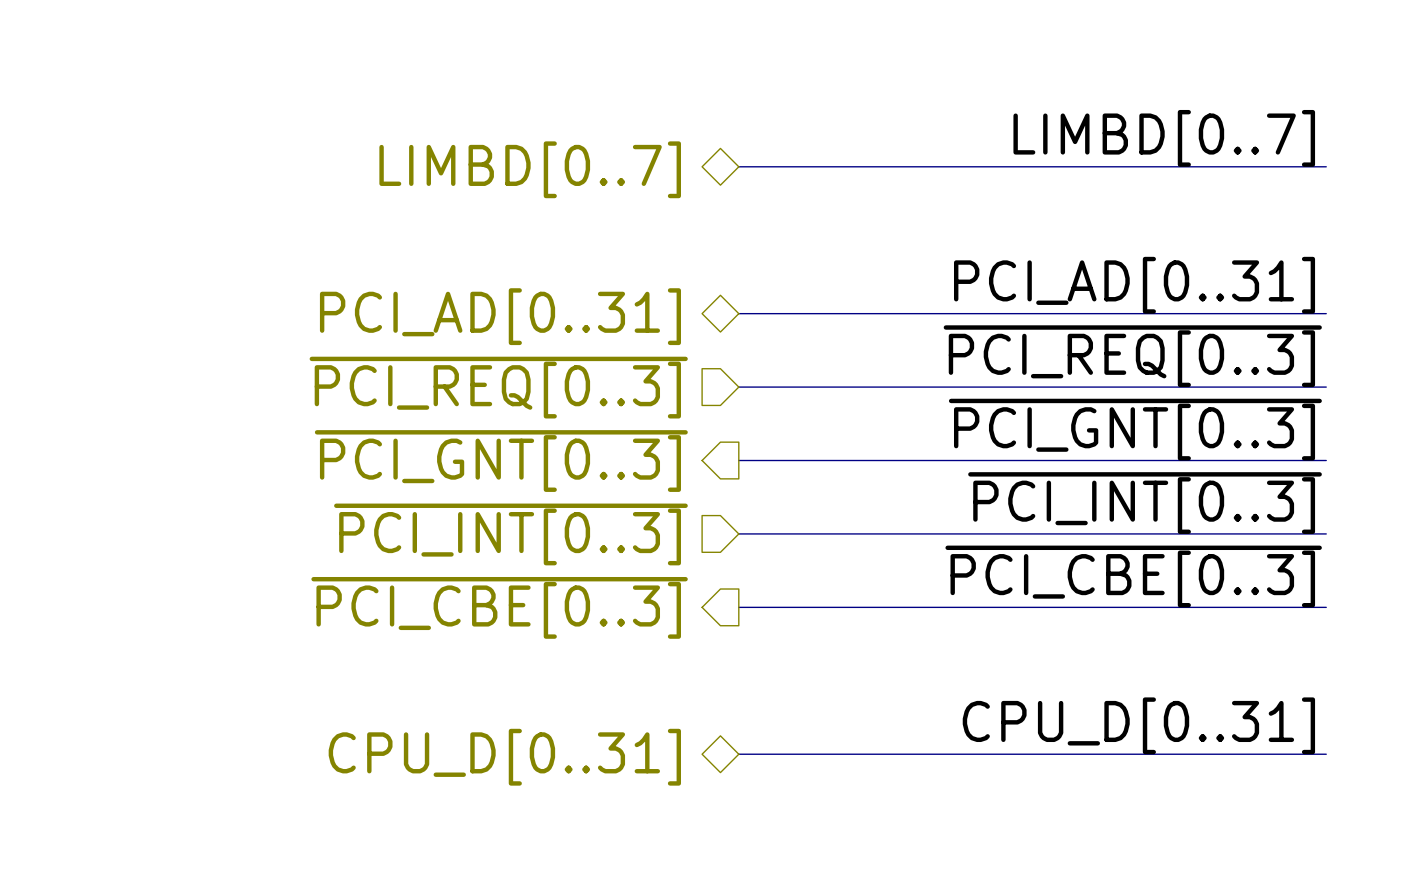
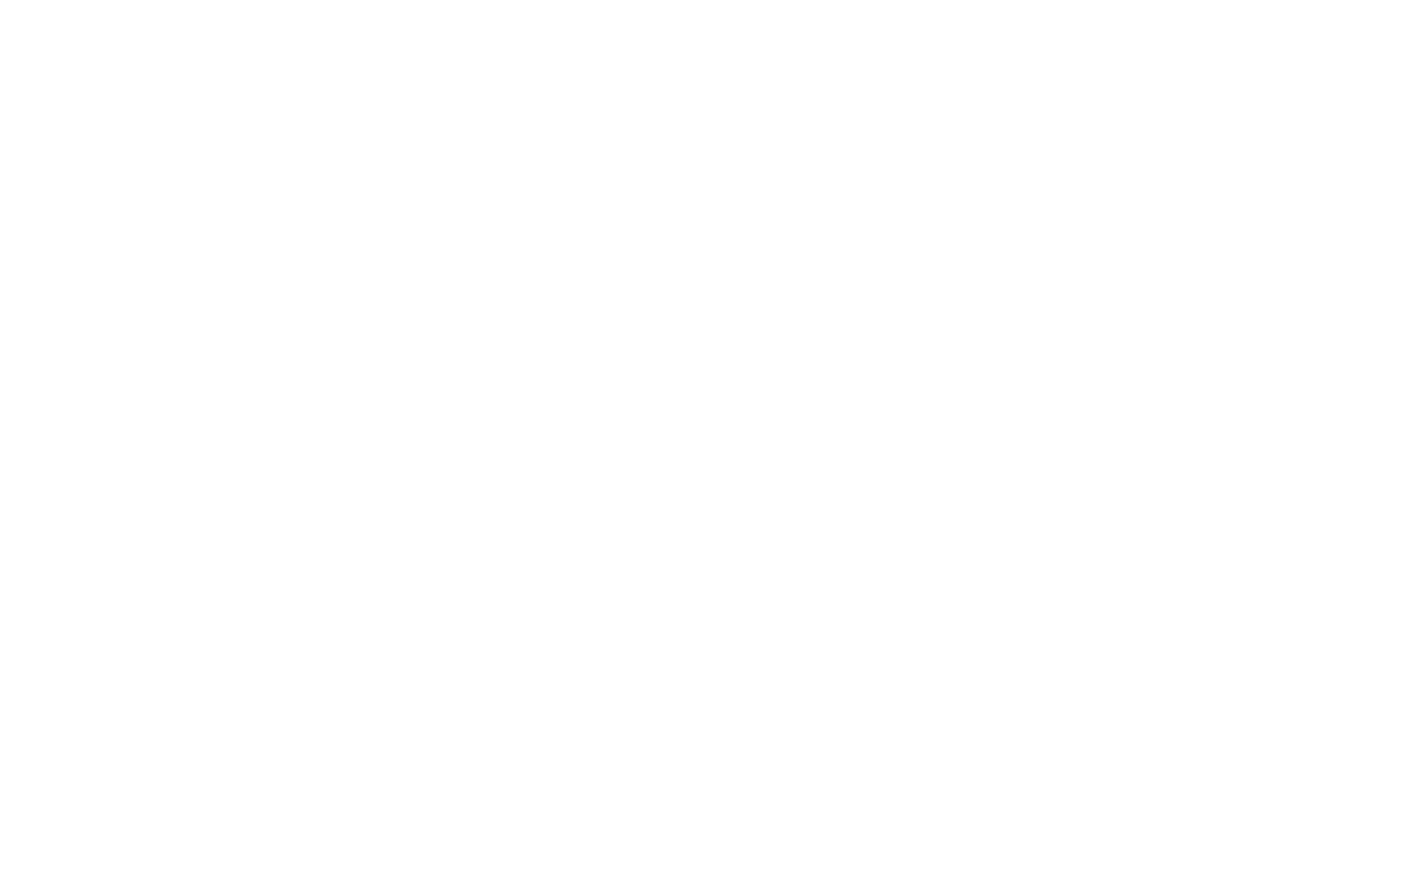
label: LIMBD[0..7] (1164, 138) -> none
bus: (738, 166) (1326, 166) -> none
hierarchical label: LIMBD[0..7] (530, 169) -> none
label: PCI_AD[0..31] (1134, 285) -> none
bus: (738, 313) (1326, 313) -> none
hierarchical label: PCI_AD[0..31] (500, 316) -> none
label: ~{PCI_REQ[0..3]} (1132, 356) -> none
hierarchical label: ~{PCI_REQ[0..3]} (498, 387) -> none
bus: (738, 387) (1326, 387) -> none
label: ~{PCI_GNT[0..3]} (1135, 429) -> none
bus: (738, 460) (1326, 460) -> none
hierarchical label: ~{PCI_GNT[0..3]} (501, 461) -> none
label: ~{PCI_INT[0..3]} (1145, 503) -> none
bus: (738, 533) (1326, 533) -> none
hierarchical label: ~{PCI_INT[0..3]} (510, 534) -> none
label: ~{PCI_CBE[0..3]} (1133, 576) -> none
hierarchical label: ~{PCI_CBE[0..3]} (499, 607) -> none
bus: (738, 607) (1326, 607) -> none
label: CPU_D[0..31] (1138, 725) -> none
bus: (738, 754) (1326, 754) -> none
hierarchical label: CPU_D[0..31] (504, 757) -> none

